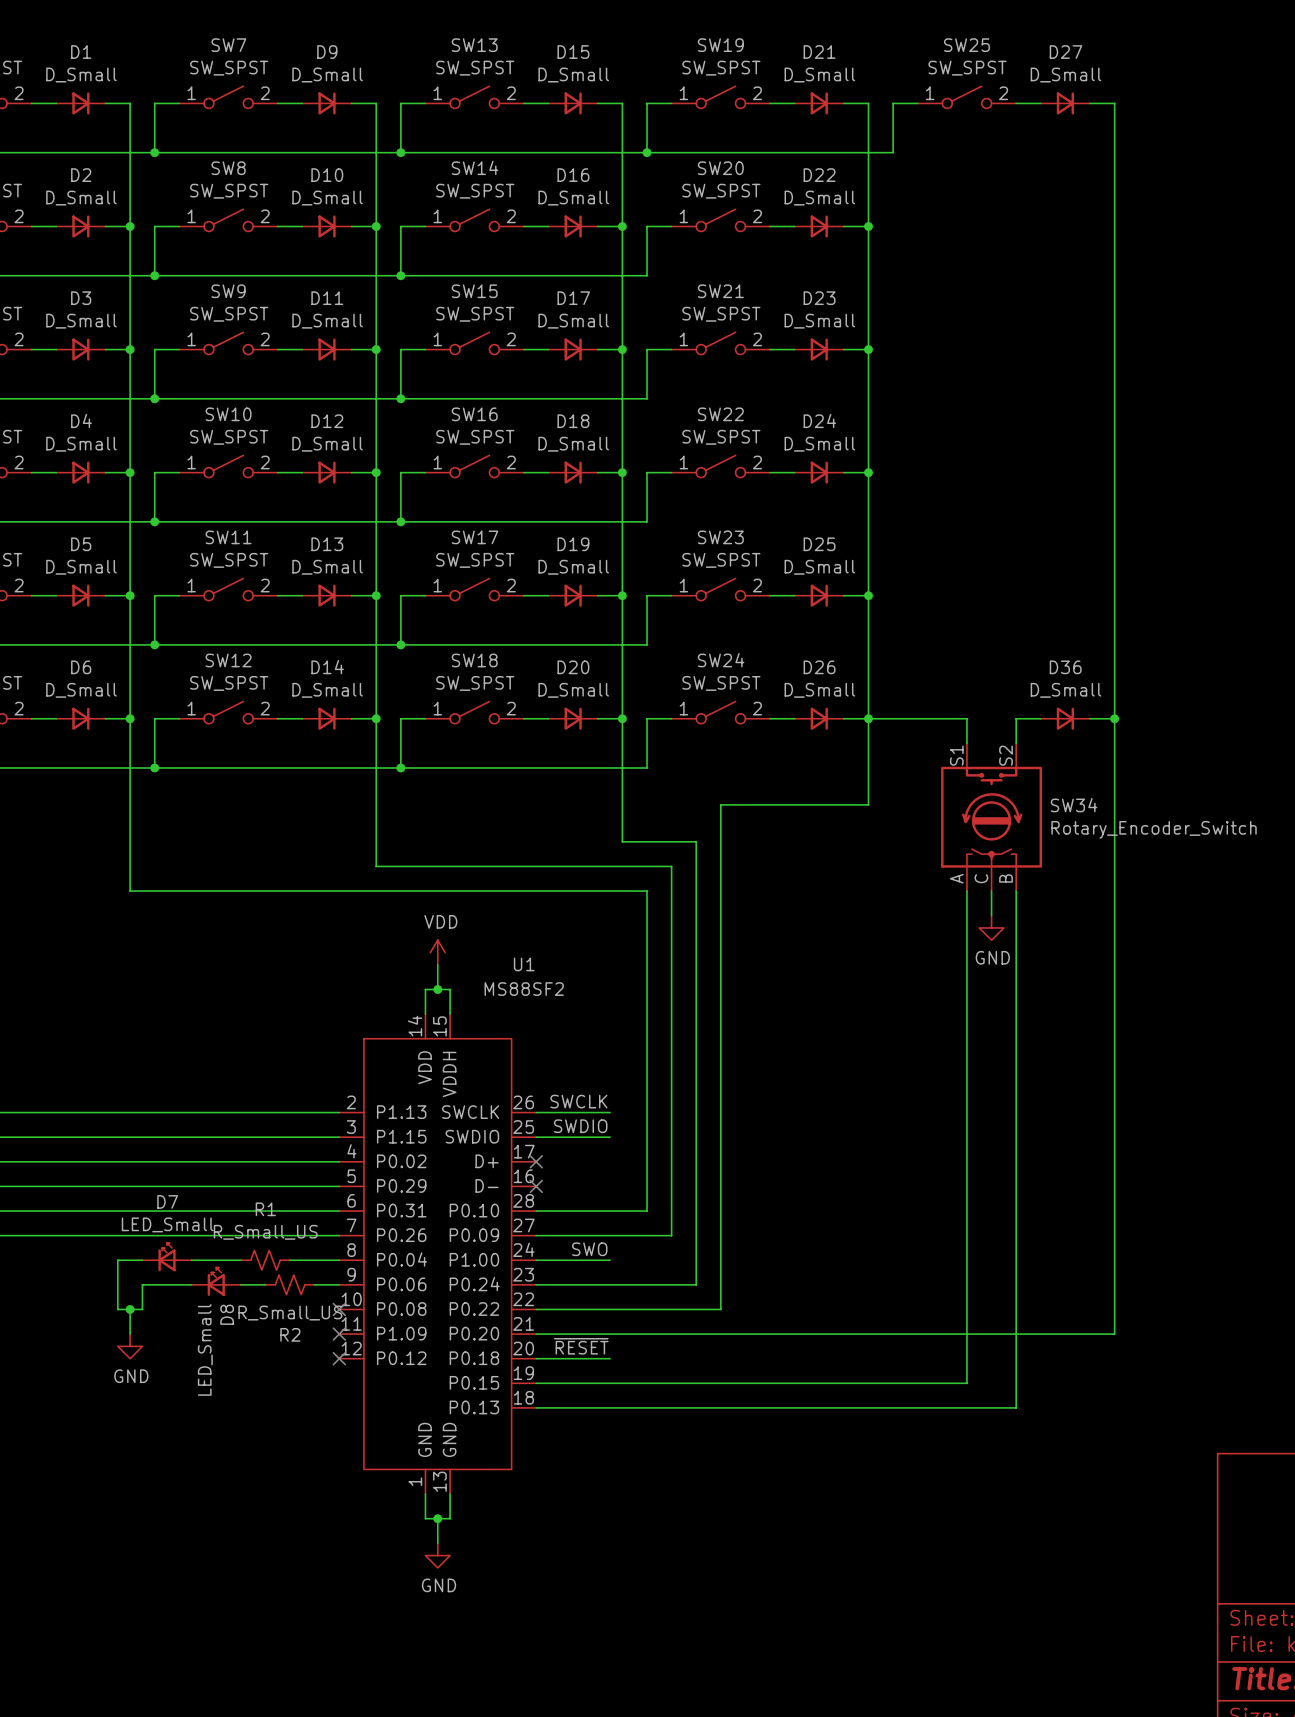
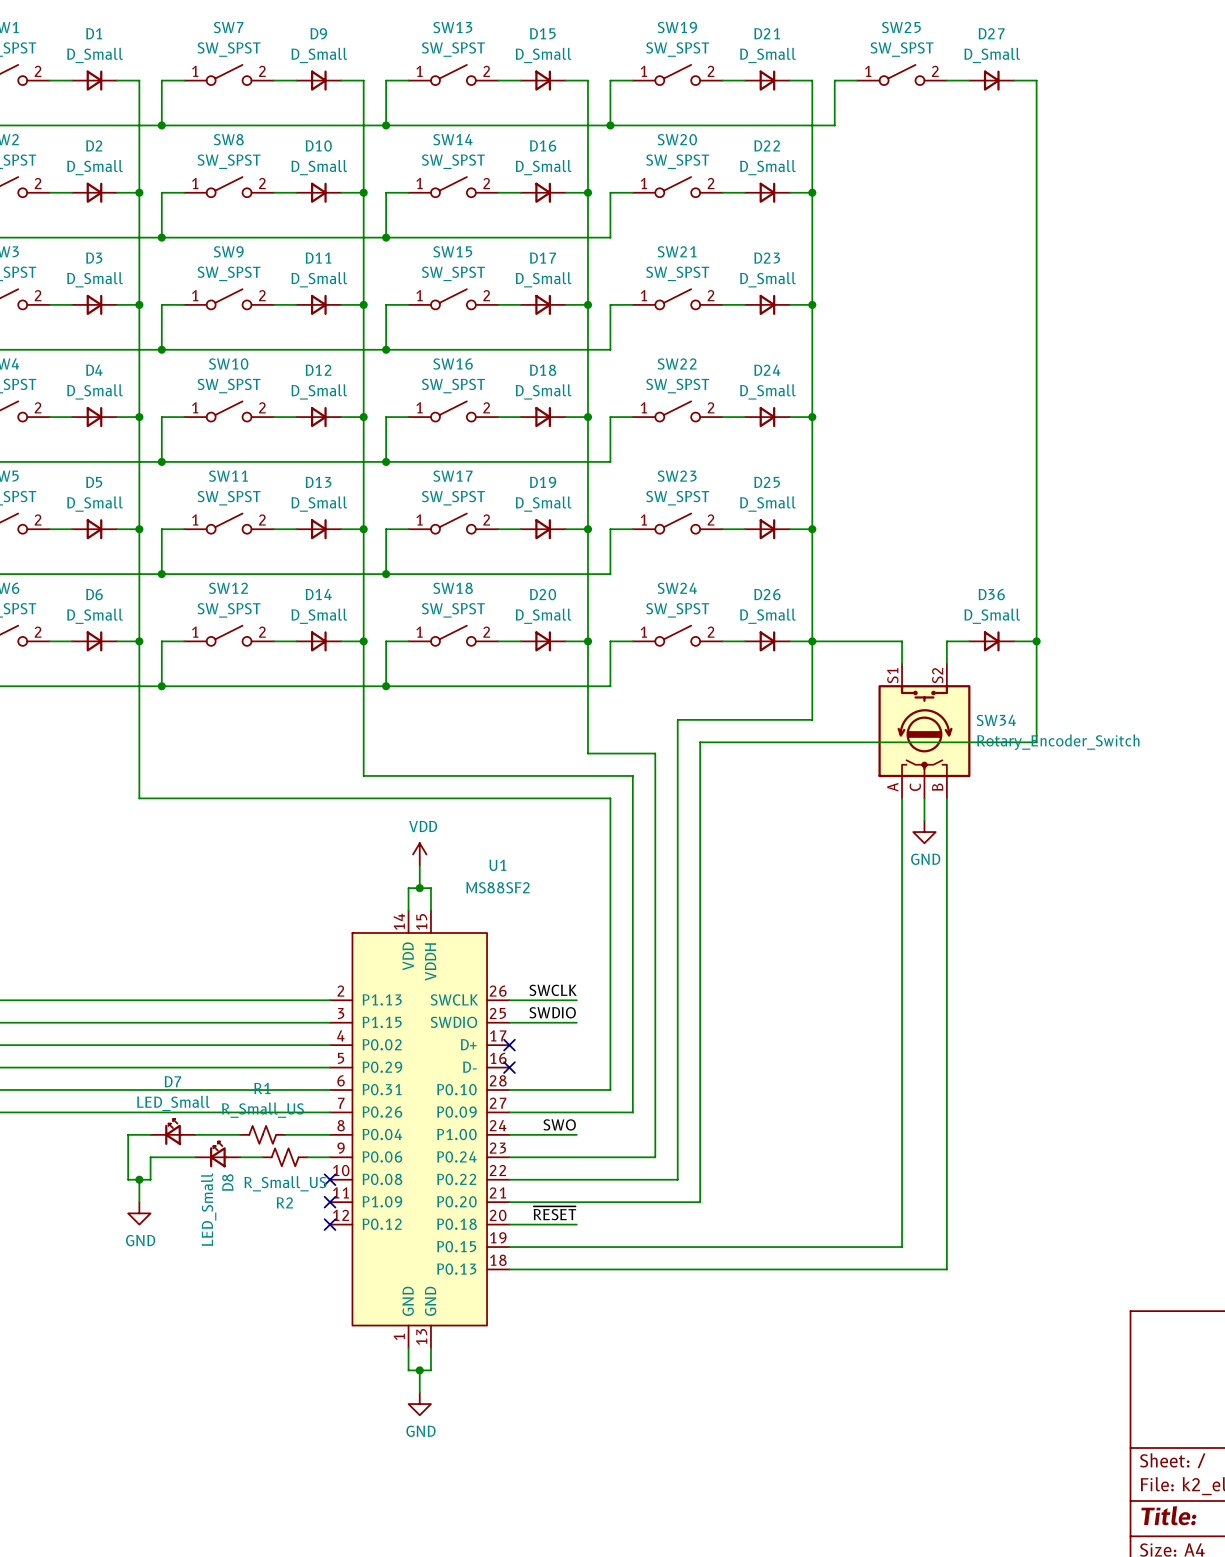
wire: (1114, 829) (1114, 1334) (745, 1334) -> (1036, 742) (700, 742) (700, 1202)

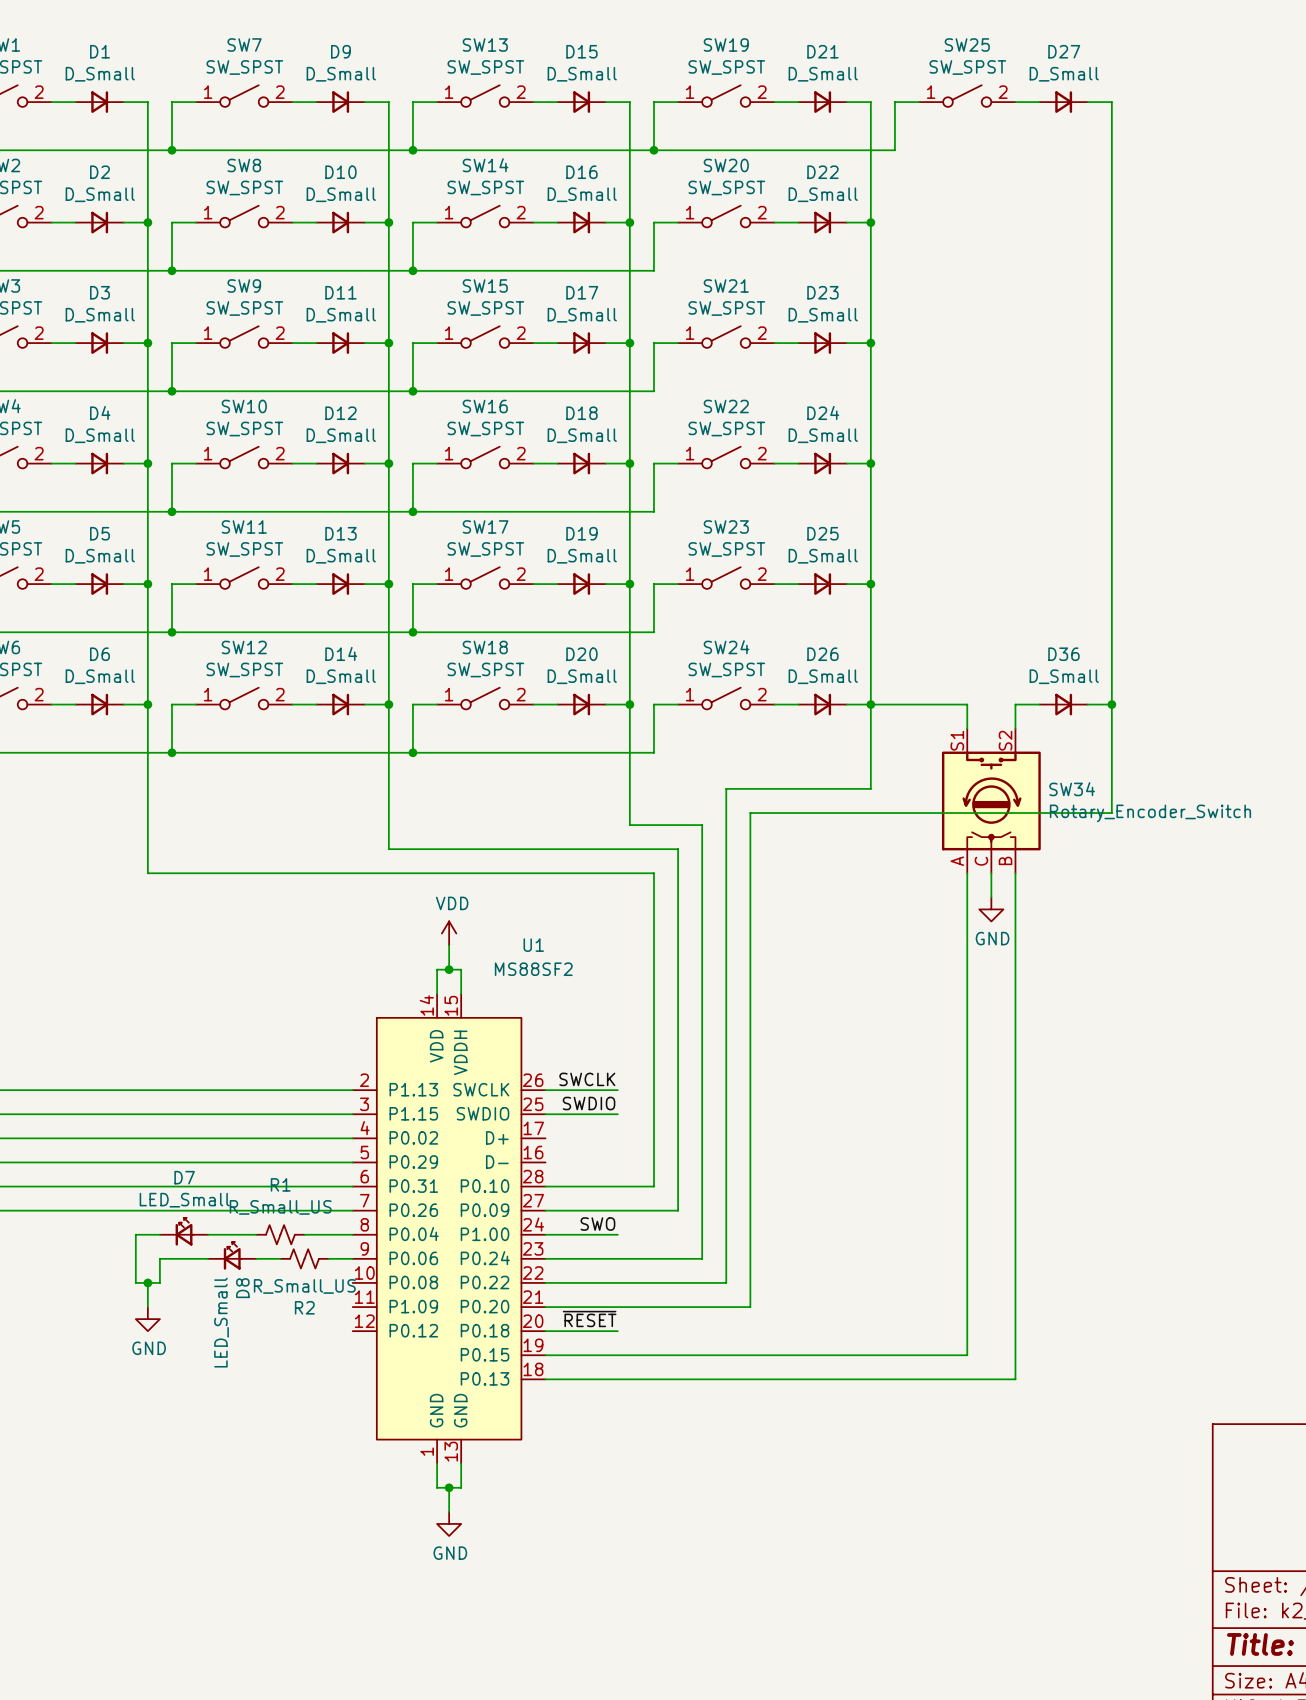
no-connect mark: (509, 1045) -> none
no-connect mark: (509, 1067) -> none
no-connect mark: (330, 1179) -> none
no-connect mark: (330, 1202) -> none
no-connect mark: (330, 1224) -> none

